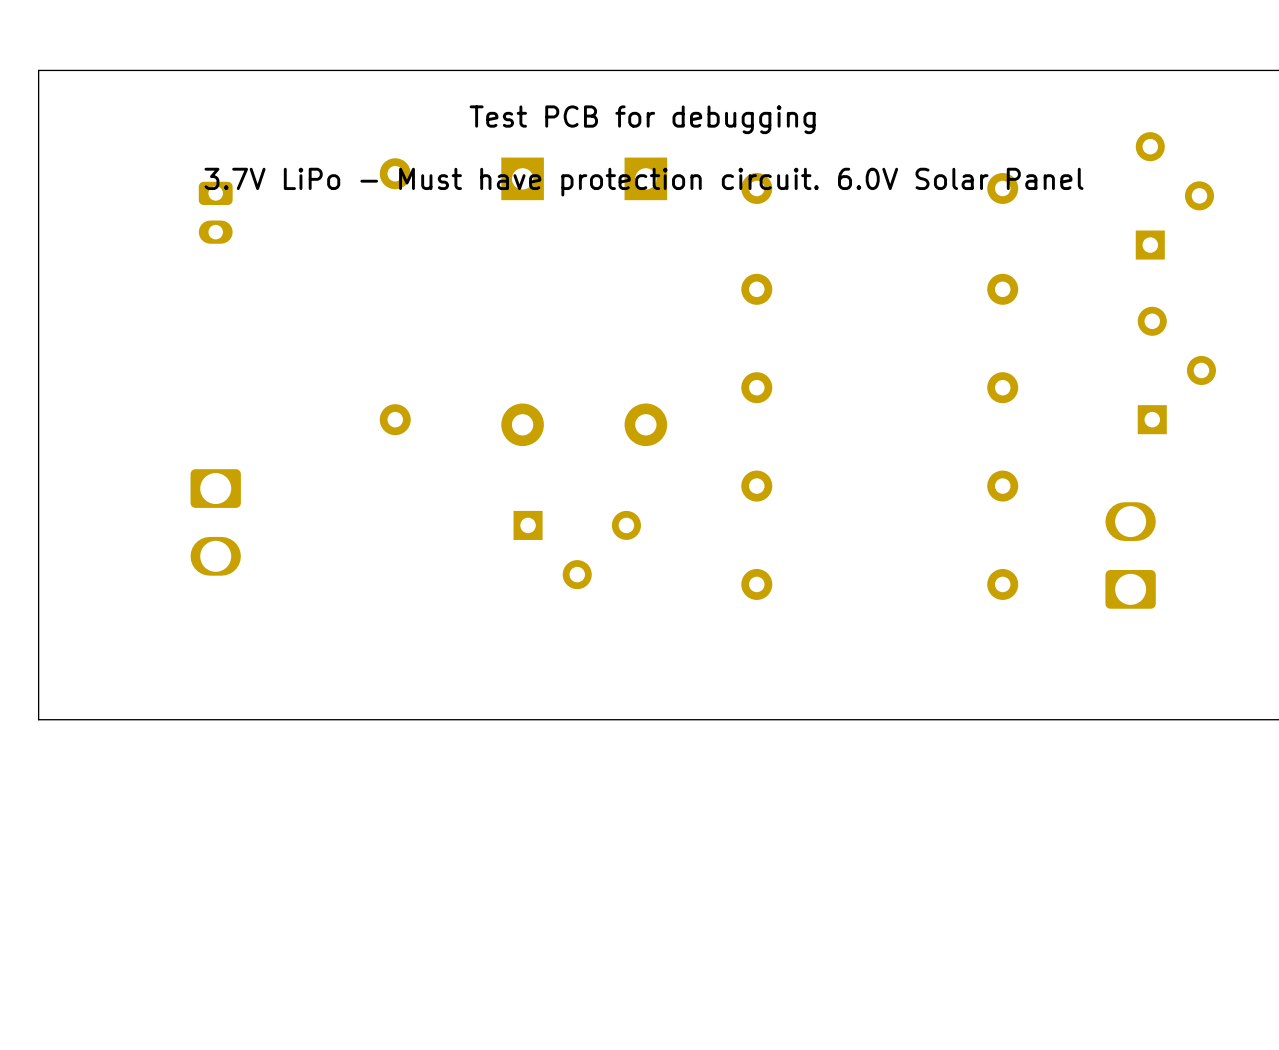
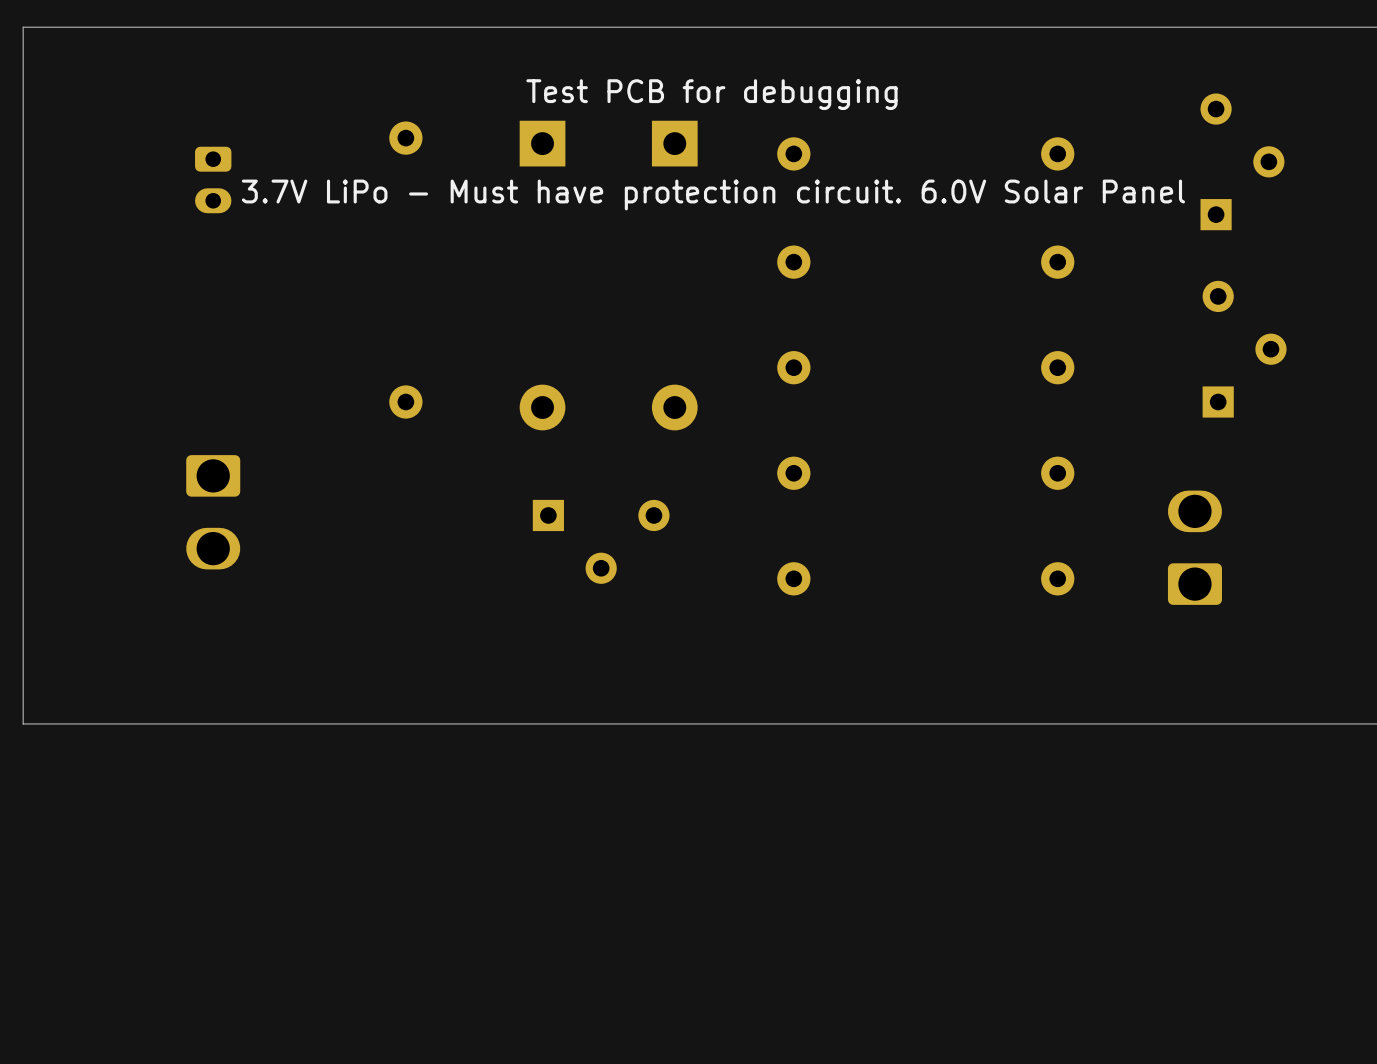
text position: Test PCB for debugging (642, 119) -> Test PCB for debugging (711, 94)
text position: 3.7V LiPo - Must have protection circuit. 6.0V Solar Panel (644, 182) -> 3.7V LiPo - Must have protection circuit. 6.0V Solar Panel (713, 194)

